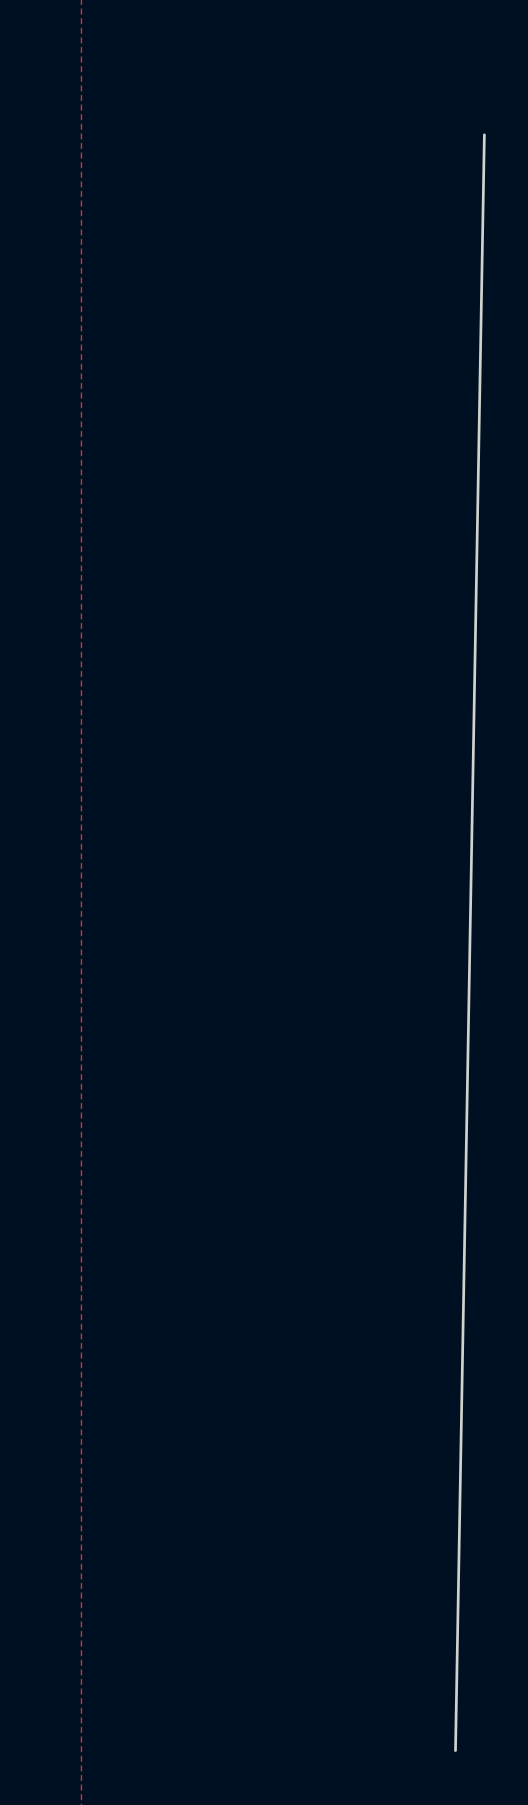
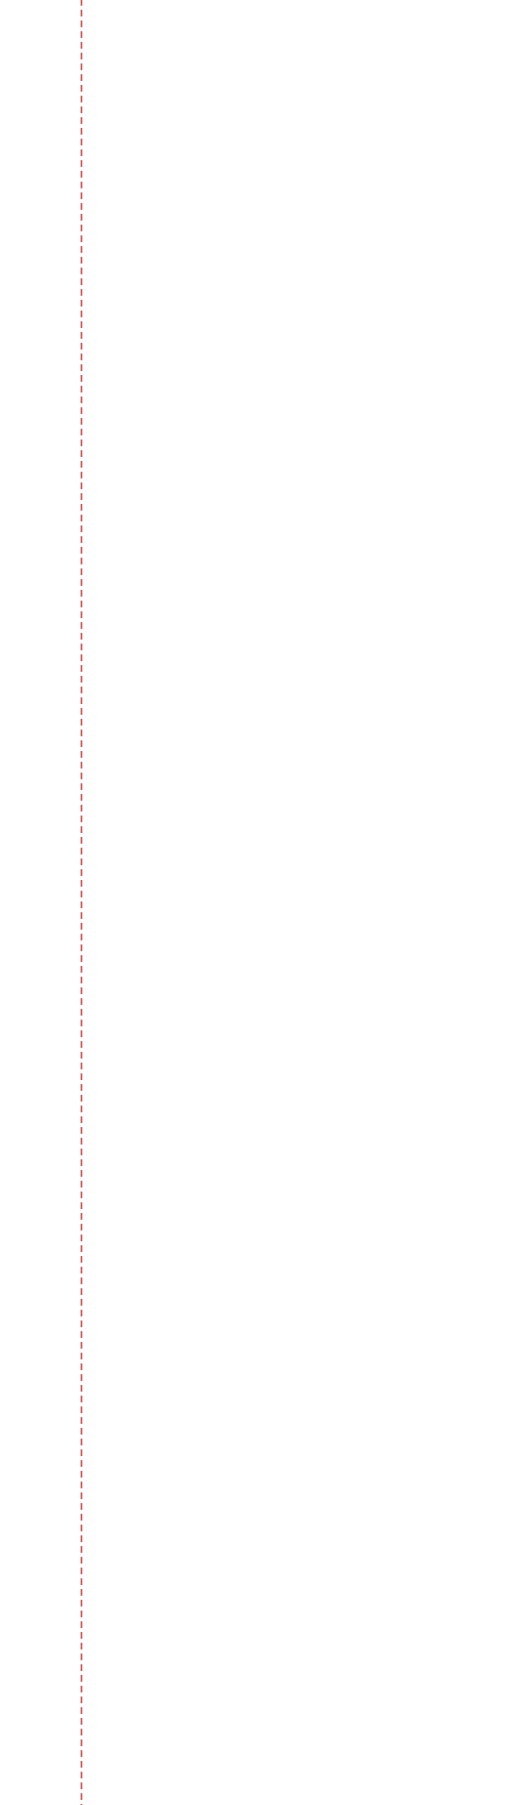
board edge: (484, 134) (455, 1750) -> none

